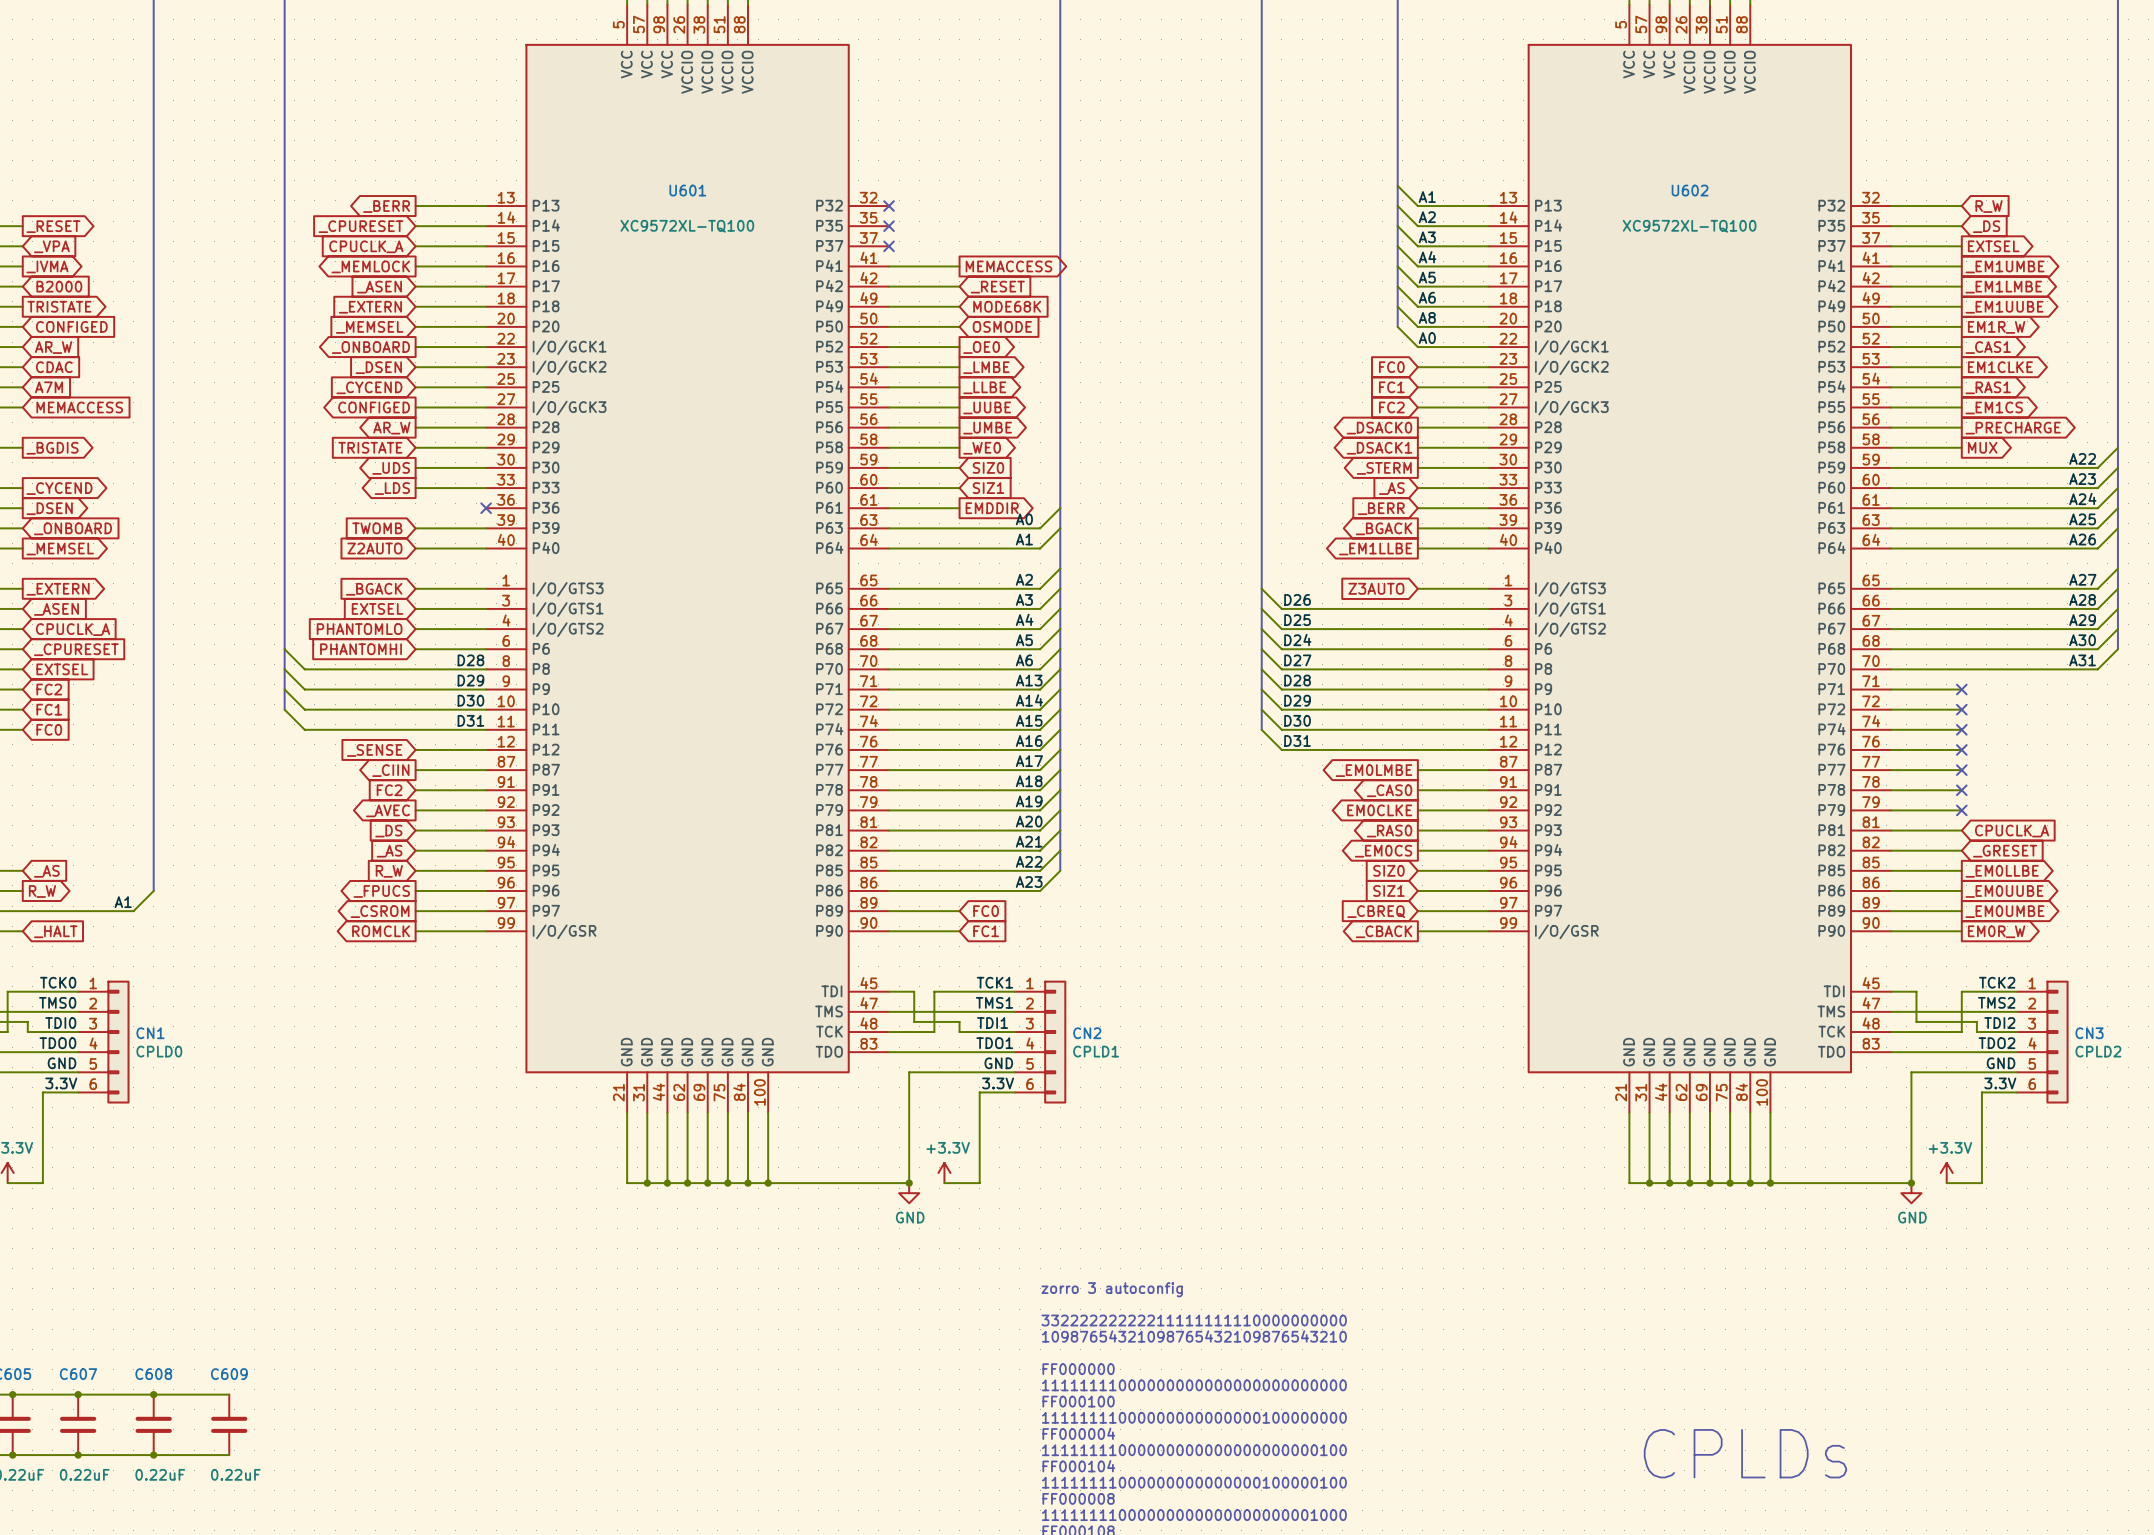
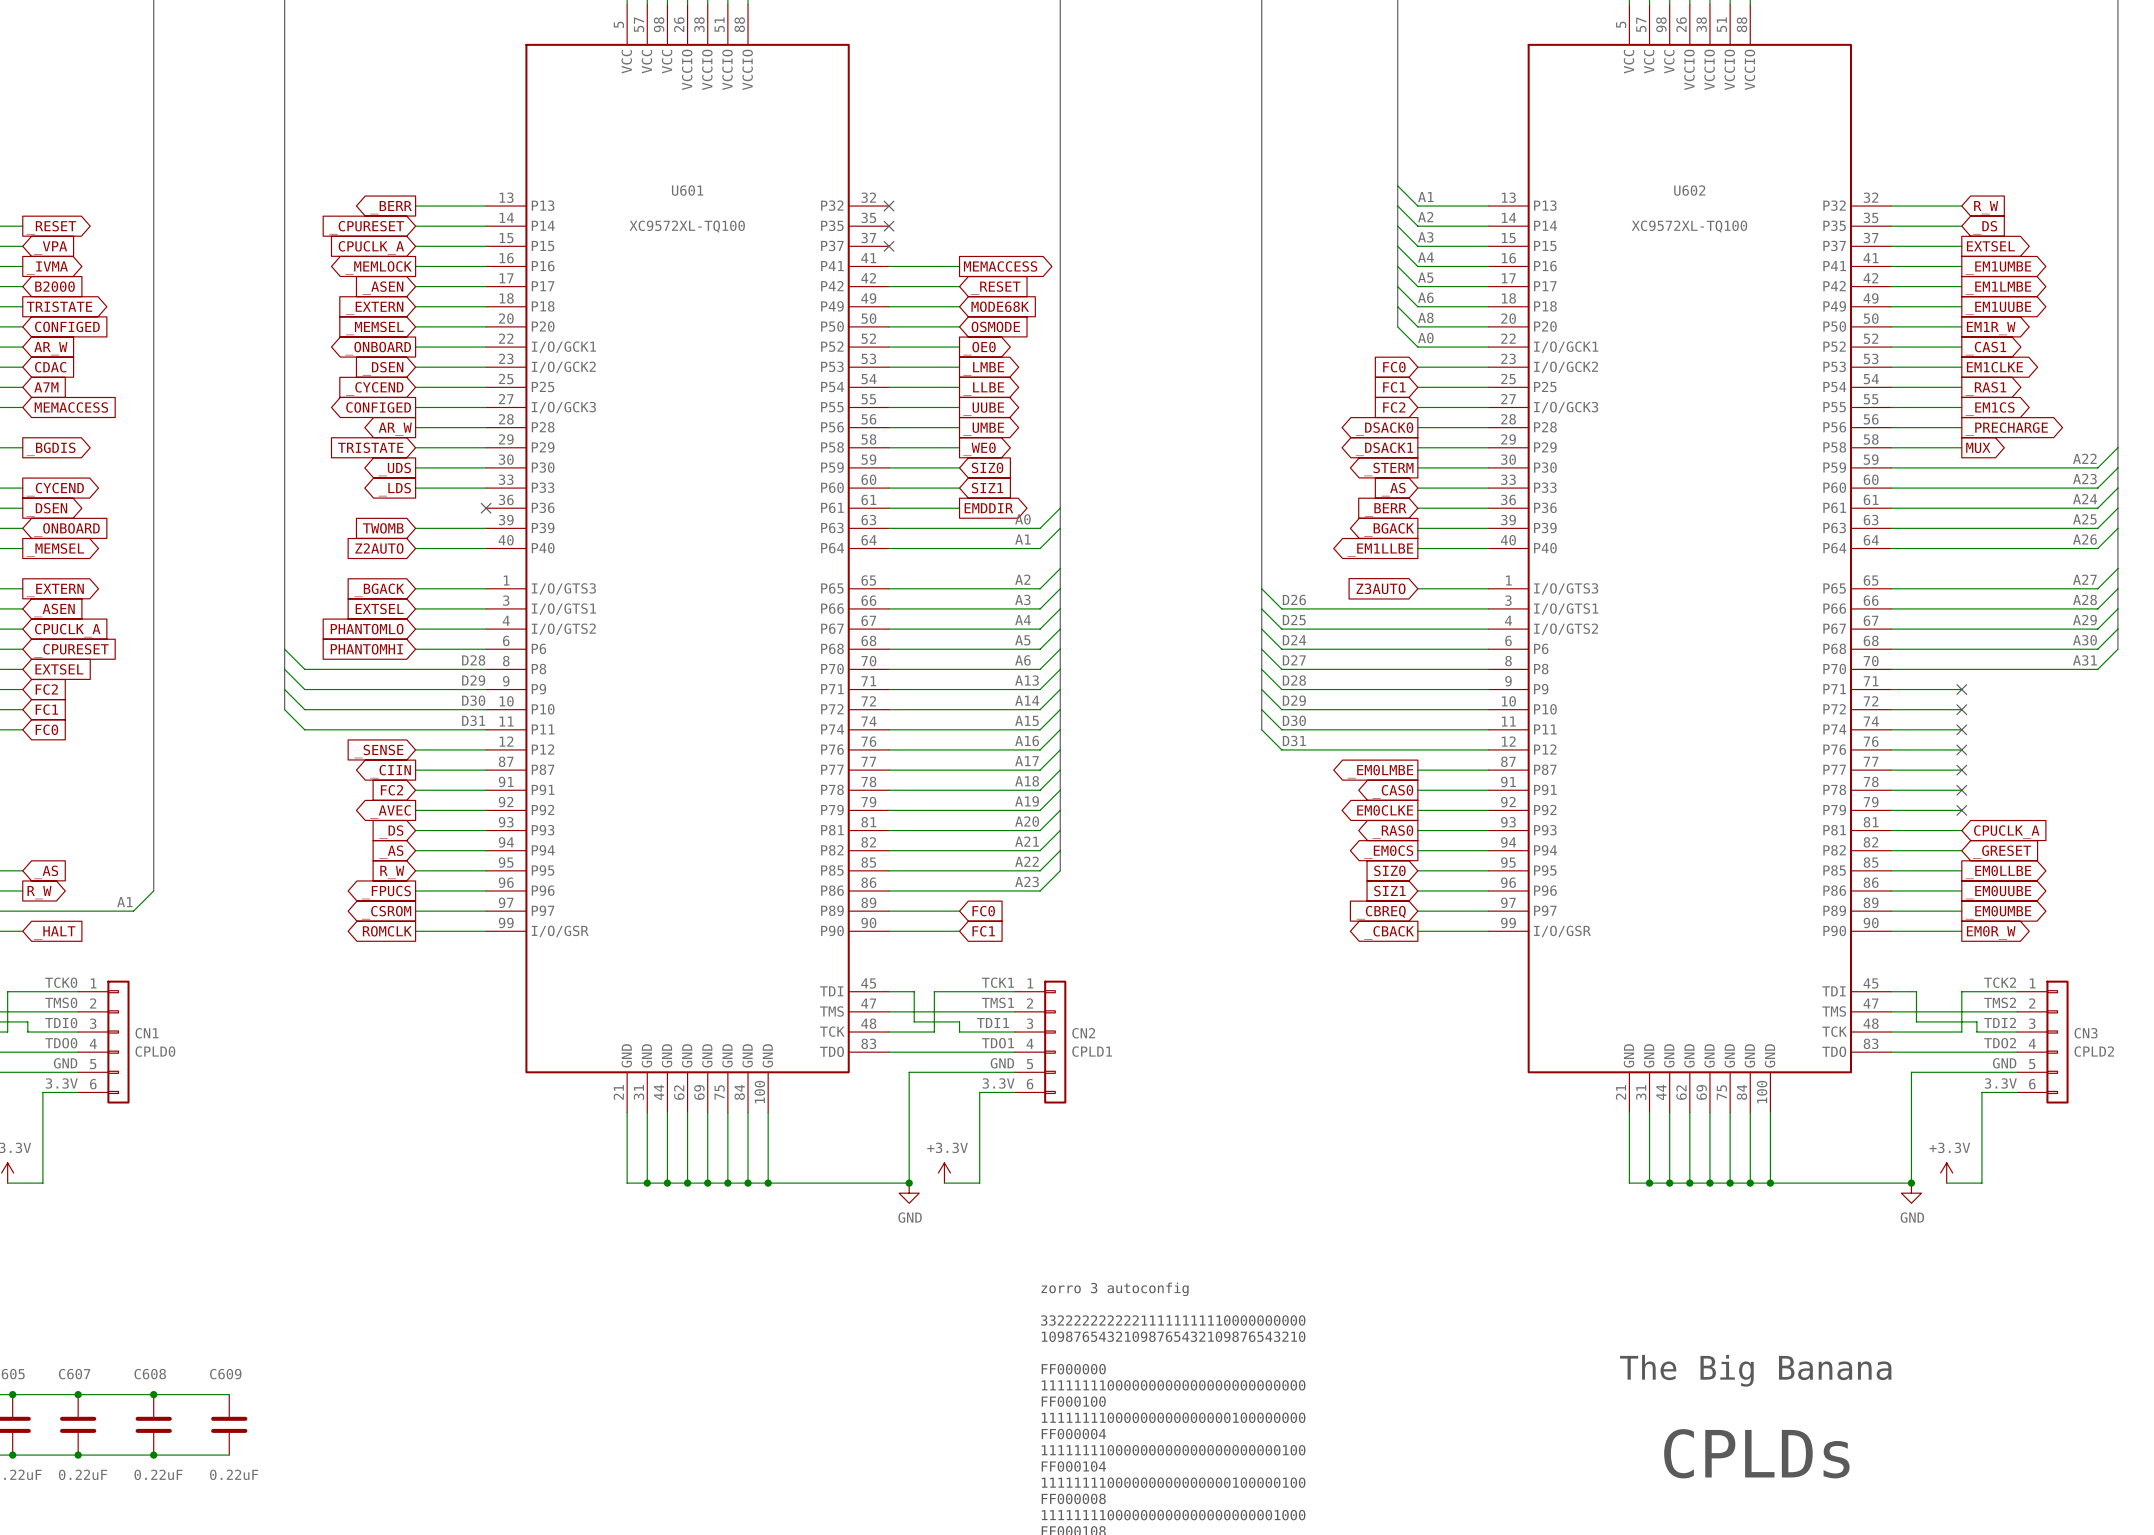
text: none -> The Big Banana (1755, 1370)

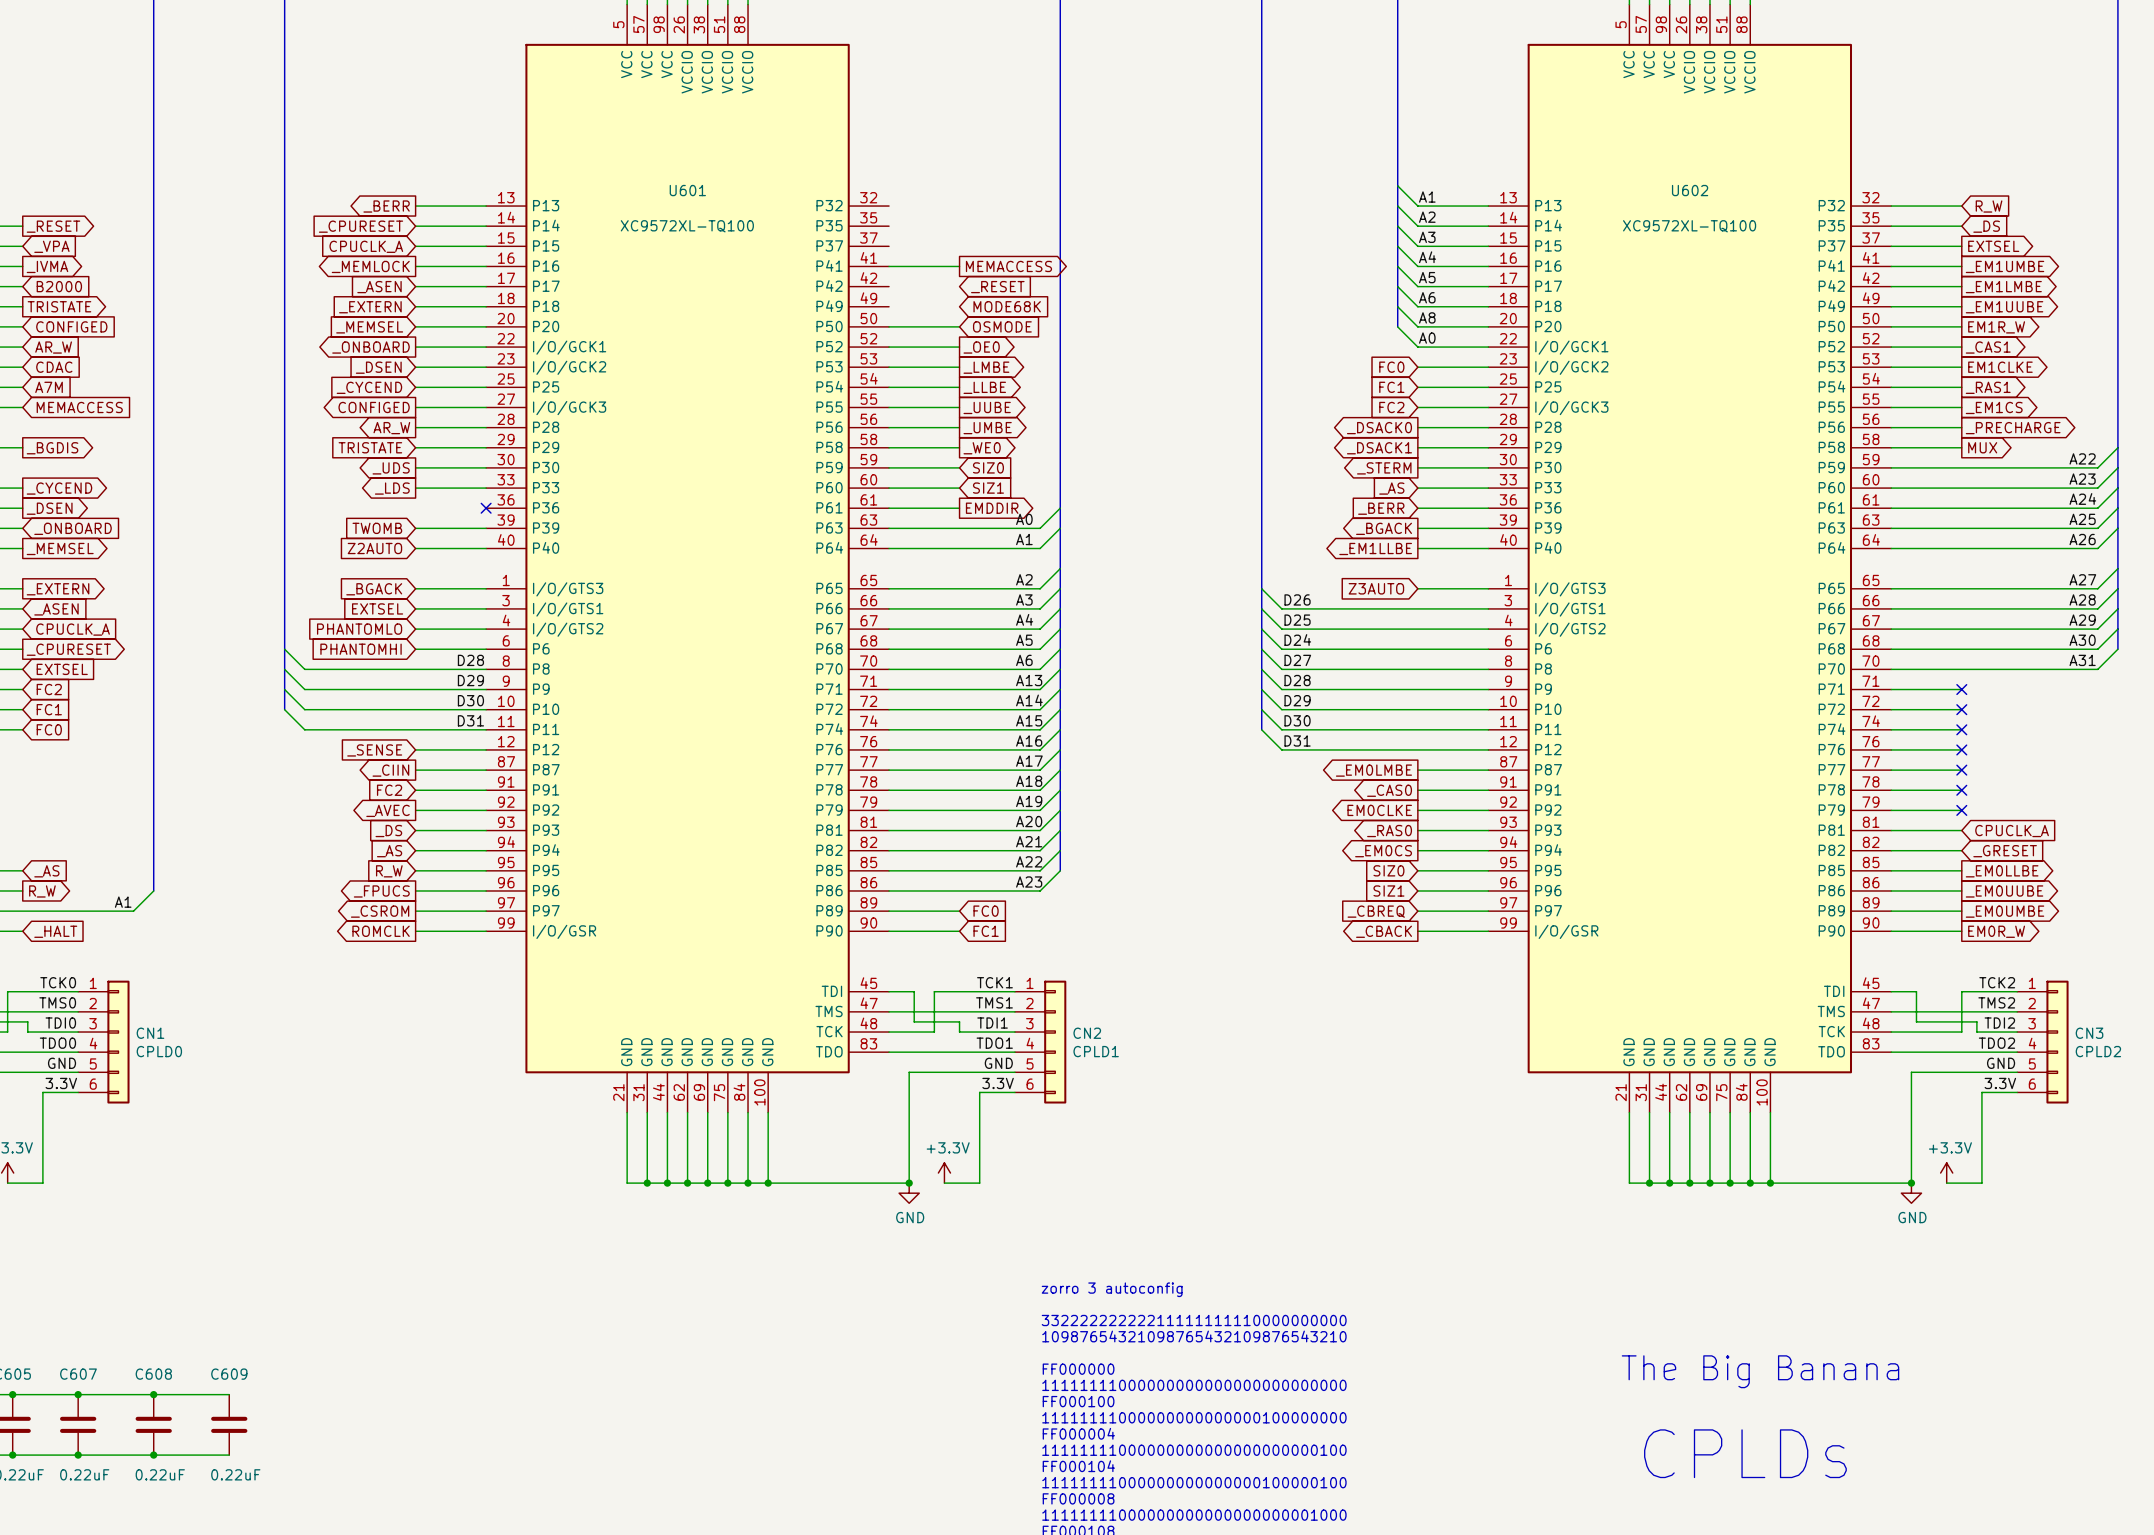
no-connect mark: (889, 206) -> none
no-connect mark: (889, 226) -> none
no-connect mark: (889, 246) -> none
wire: (889, 286) (959, 286) -> none
wire: (889, 306) (959, 306) -> none
global label shape: input (71, 650) -> output (68, 649)

